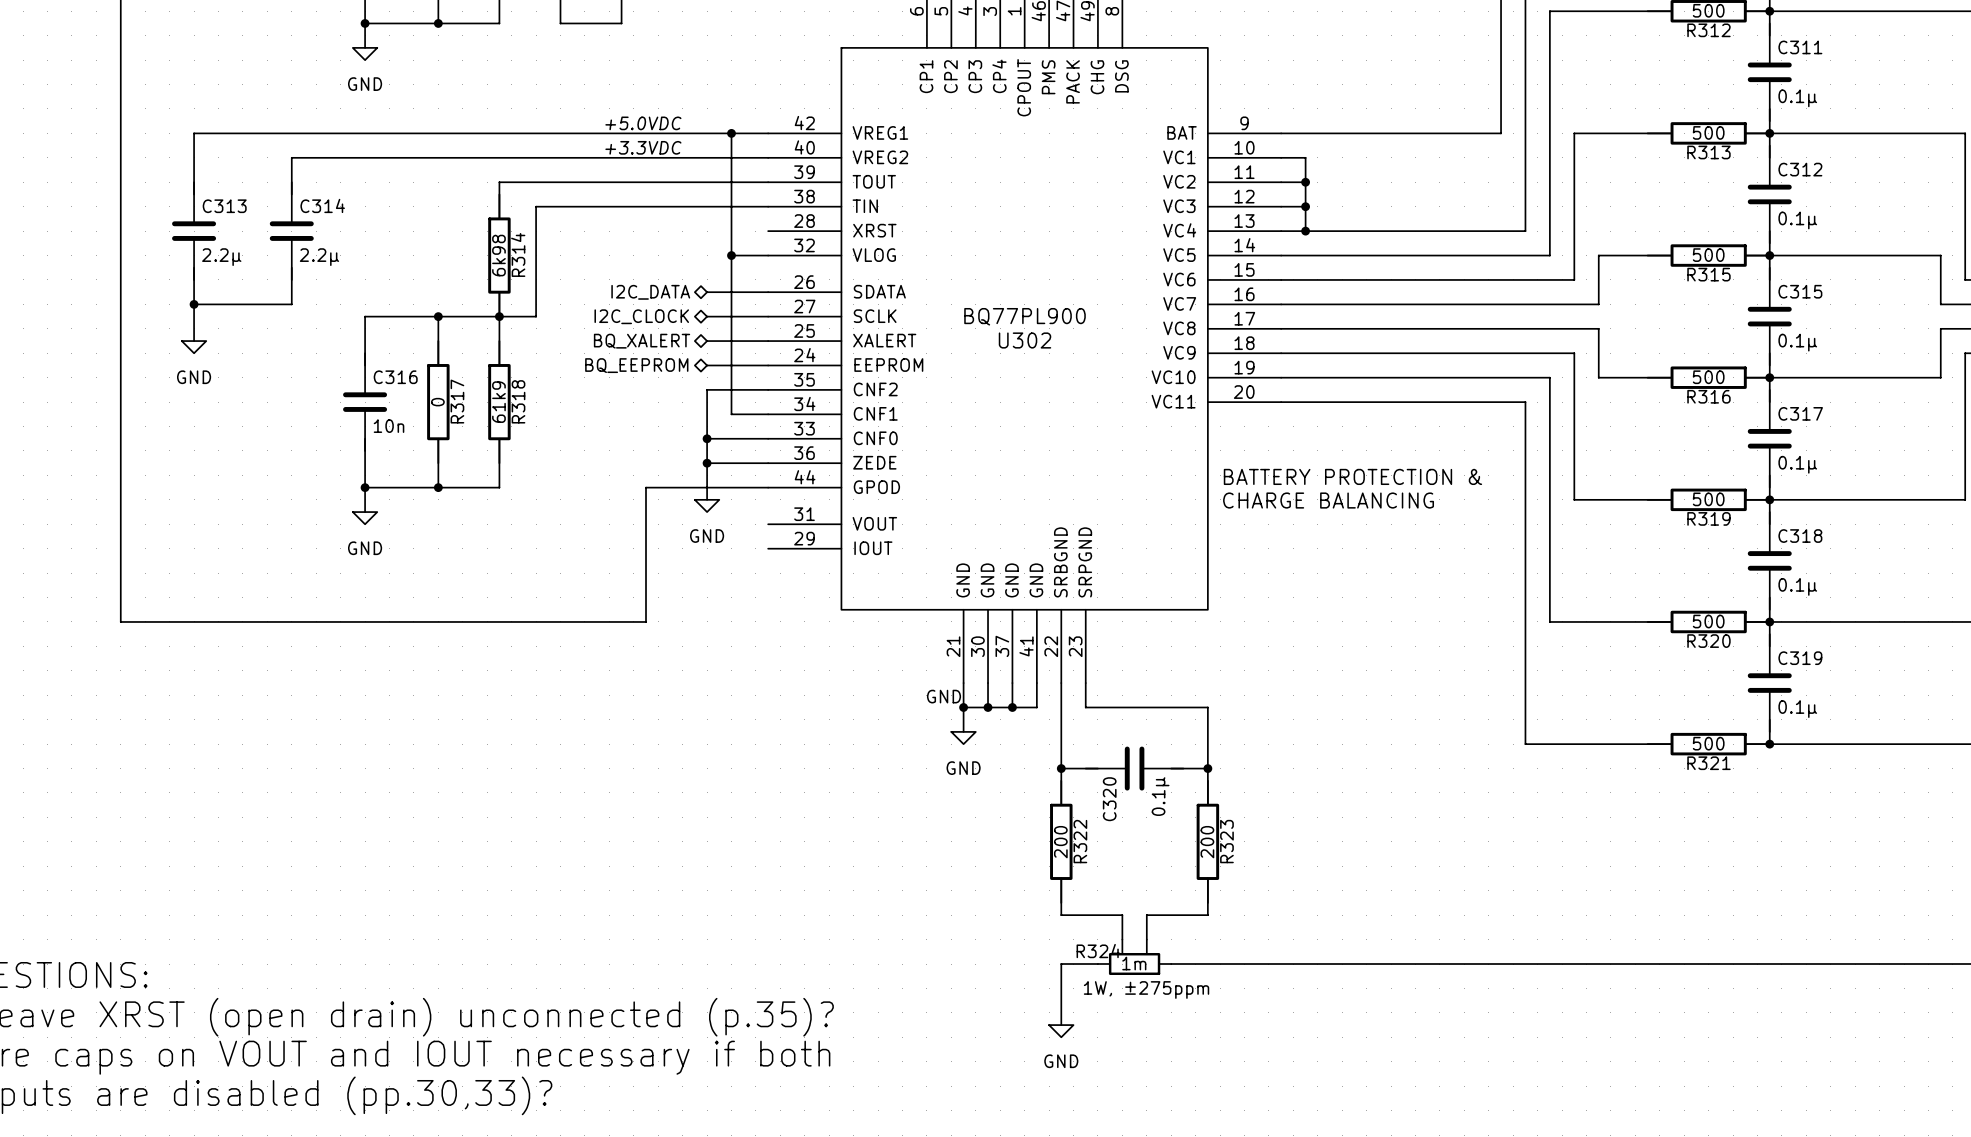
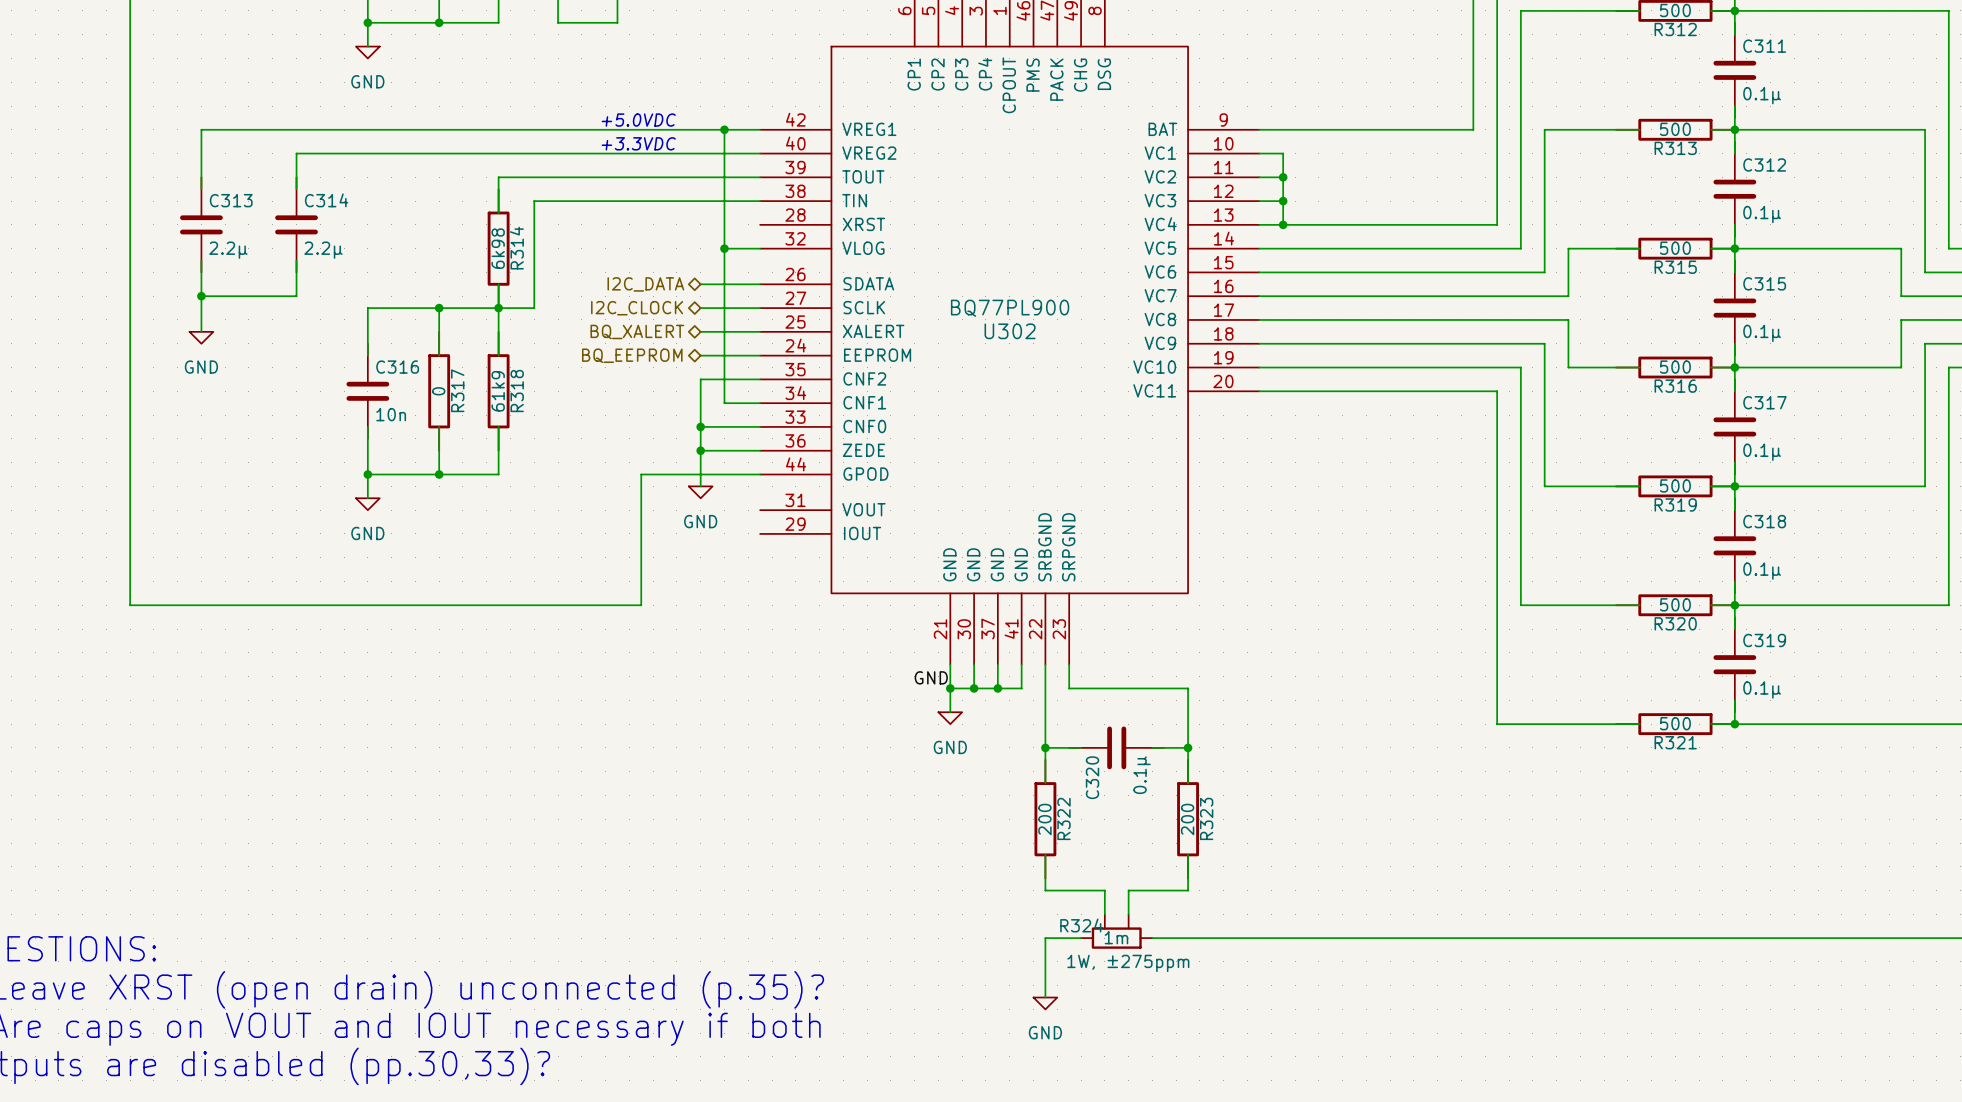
text: BATTERY PROTECTION & (1352, 476) -> none
text: CHARGE BALANCING (1328, 500) -> none

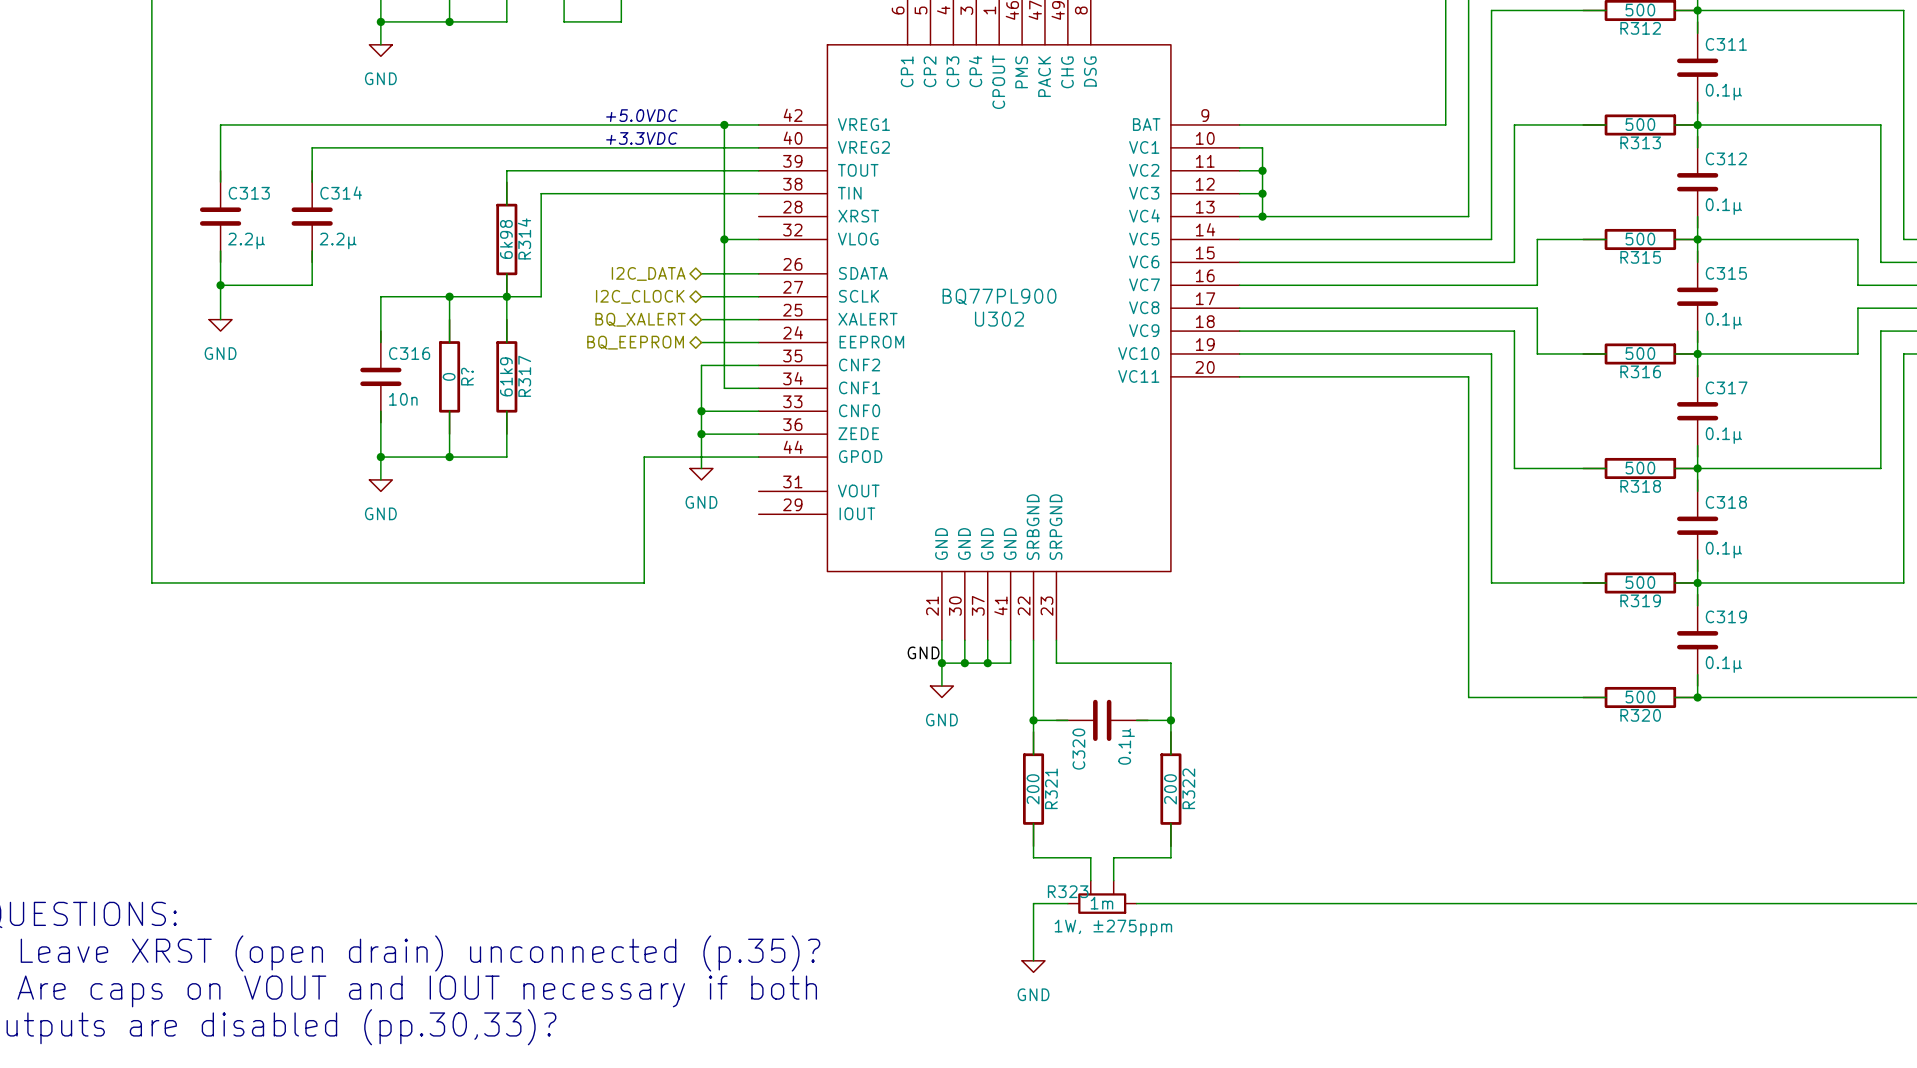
R317 name: R317 (457, 390) -> R? (467, 376)
R318 name: R318 (517, 391) -> R317 (524, 376)
R319 name: R319 (1675, 504) -> R318 (1640, 486)
R320 name: R320 (1675, 623) -> R319 (1640, 600)
R321 name: R321 (1675, 742) -> R320 (1640, 715)
R322 name: R322 (1063, 818) -> R321 (1051, 788)
R323 name: R323 (1206, 818) -> R322 (1188, 788)
R324 name: R324 (1081, 925) -> R323 (1068, 891)

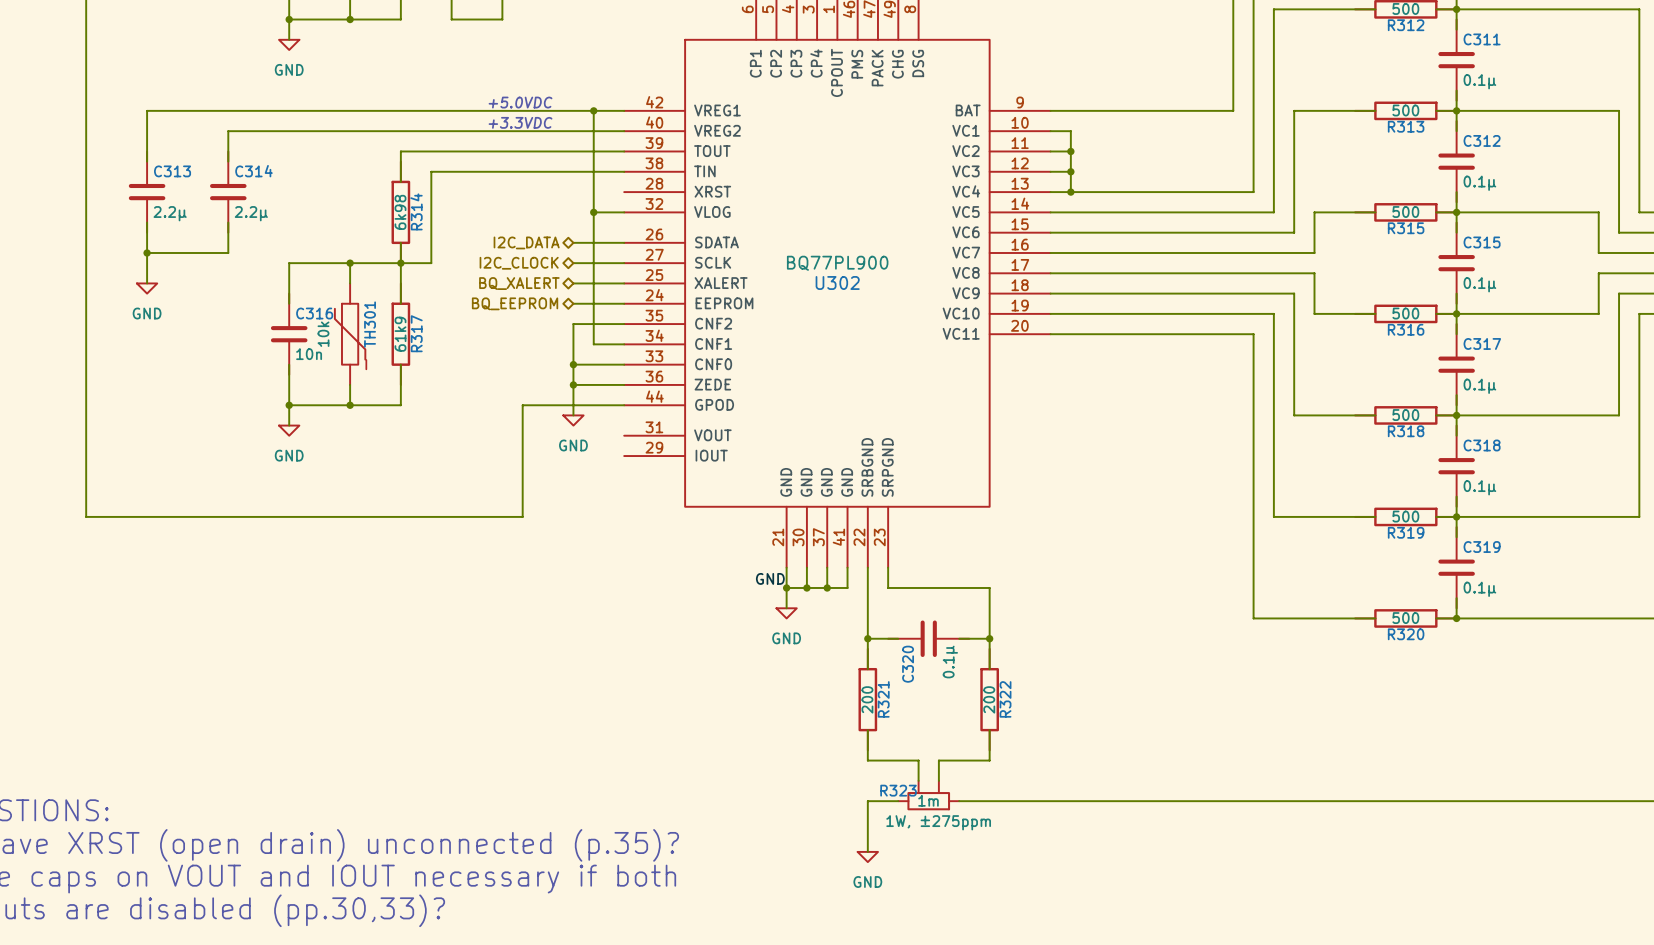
R?: 0 (449, 376) -> none
TH301: none -> 10k (350, 334)

